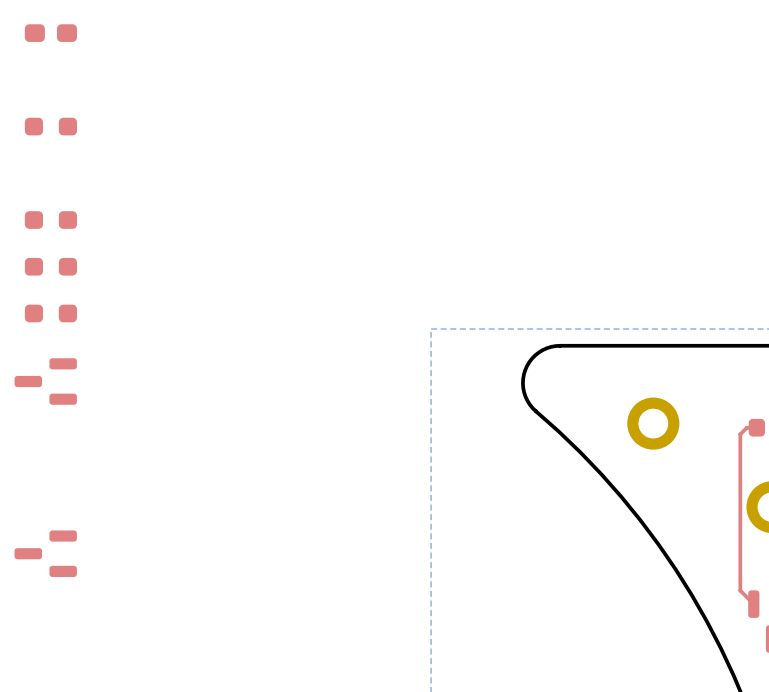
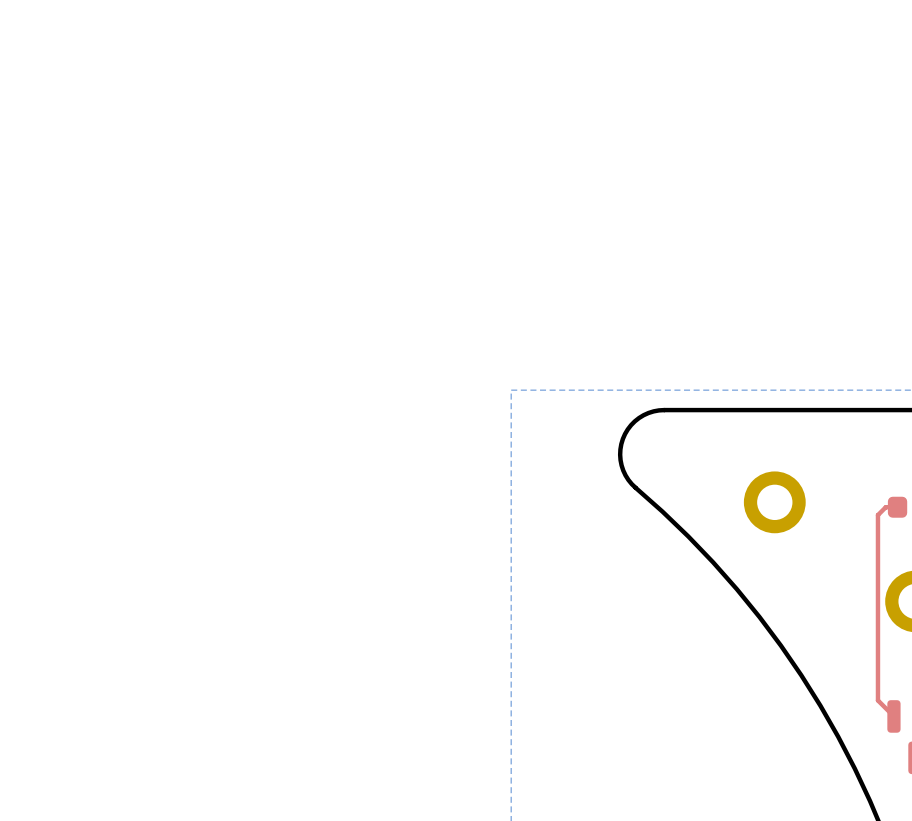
part: (50, 33) -> none
part: (50, 126) -> none
part: (50, 220) -> none
part: (50, 266) -> none
part: (50, 313) -> none
part: (45, 381) -> none
part: (45, 553) -> none

